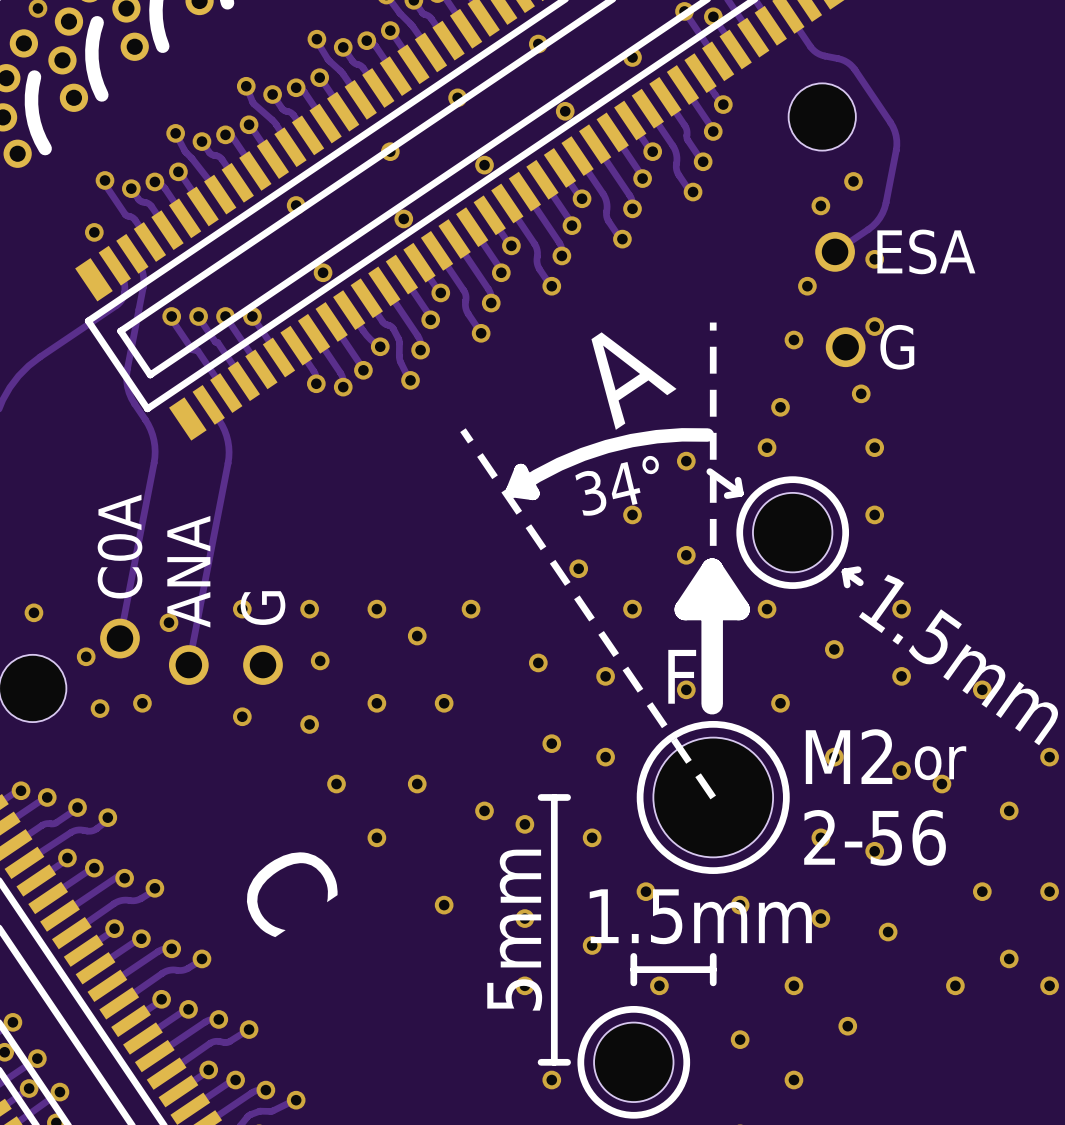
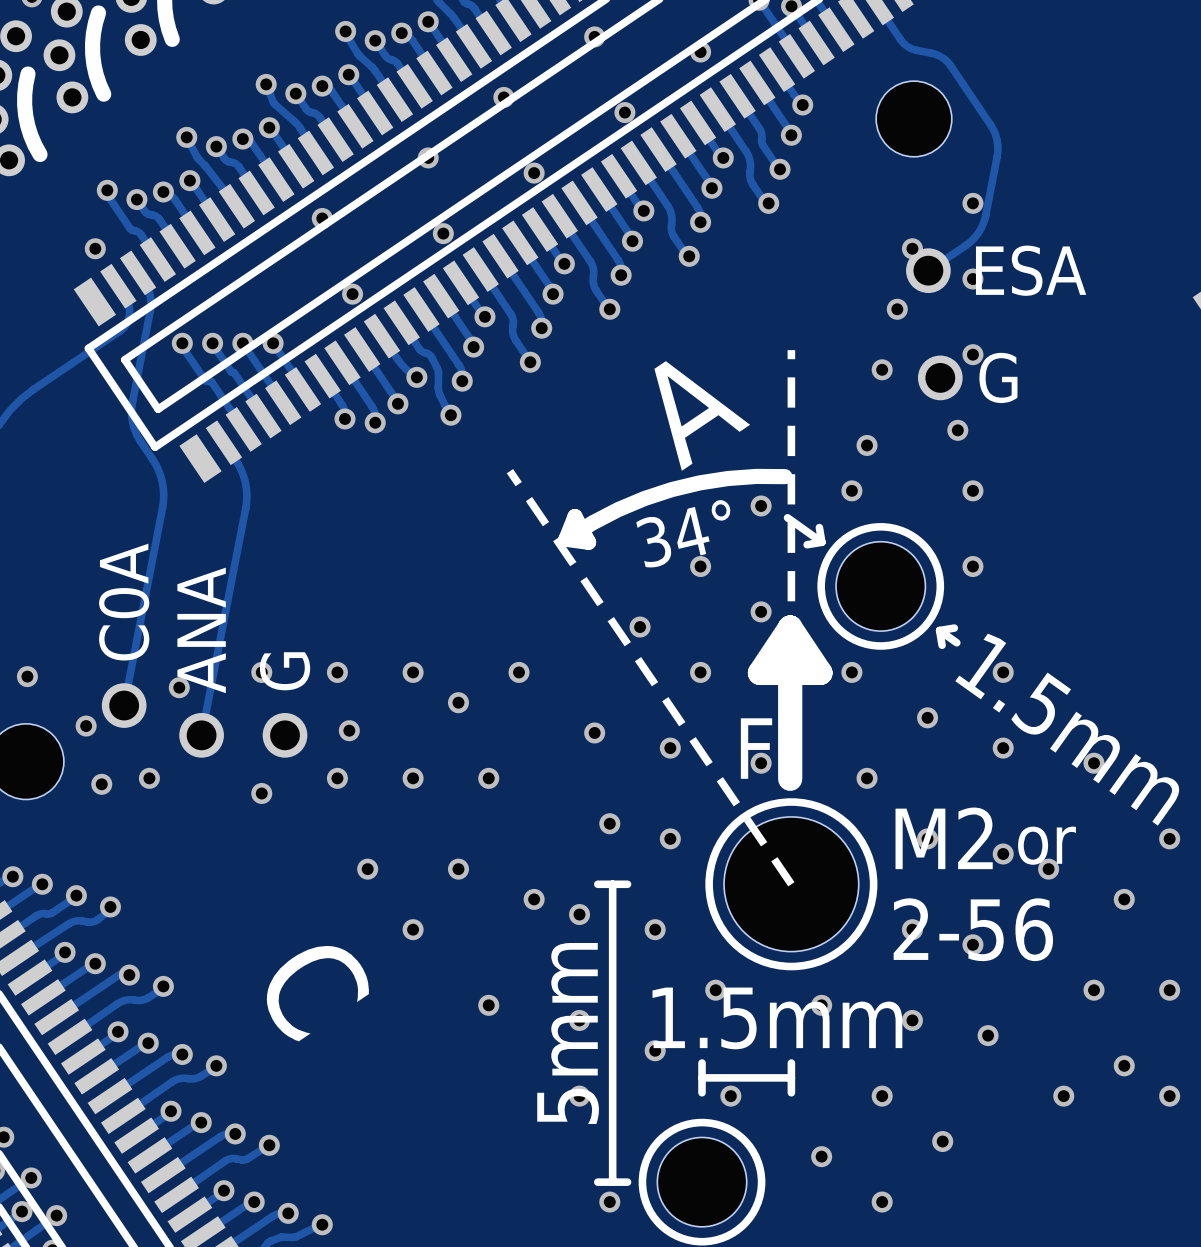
via position: (853, 181) -> (972, 203)
via position: (820, 205) -> (912, 248)
via position: (309, 724) -> (337, 778)

